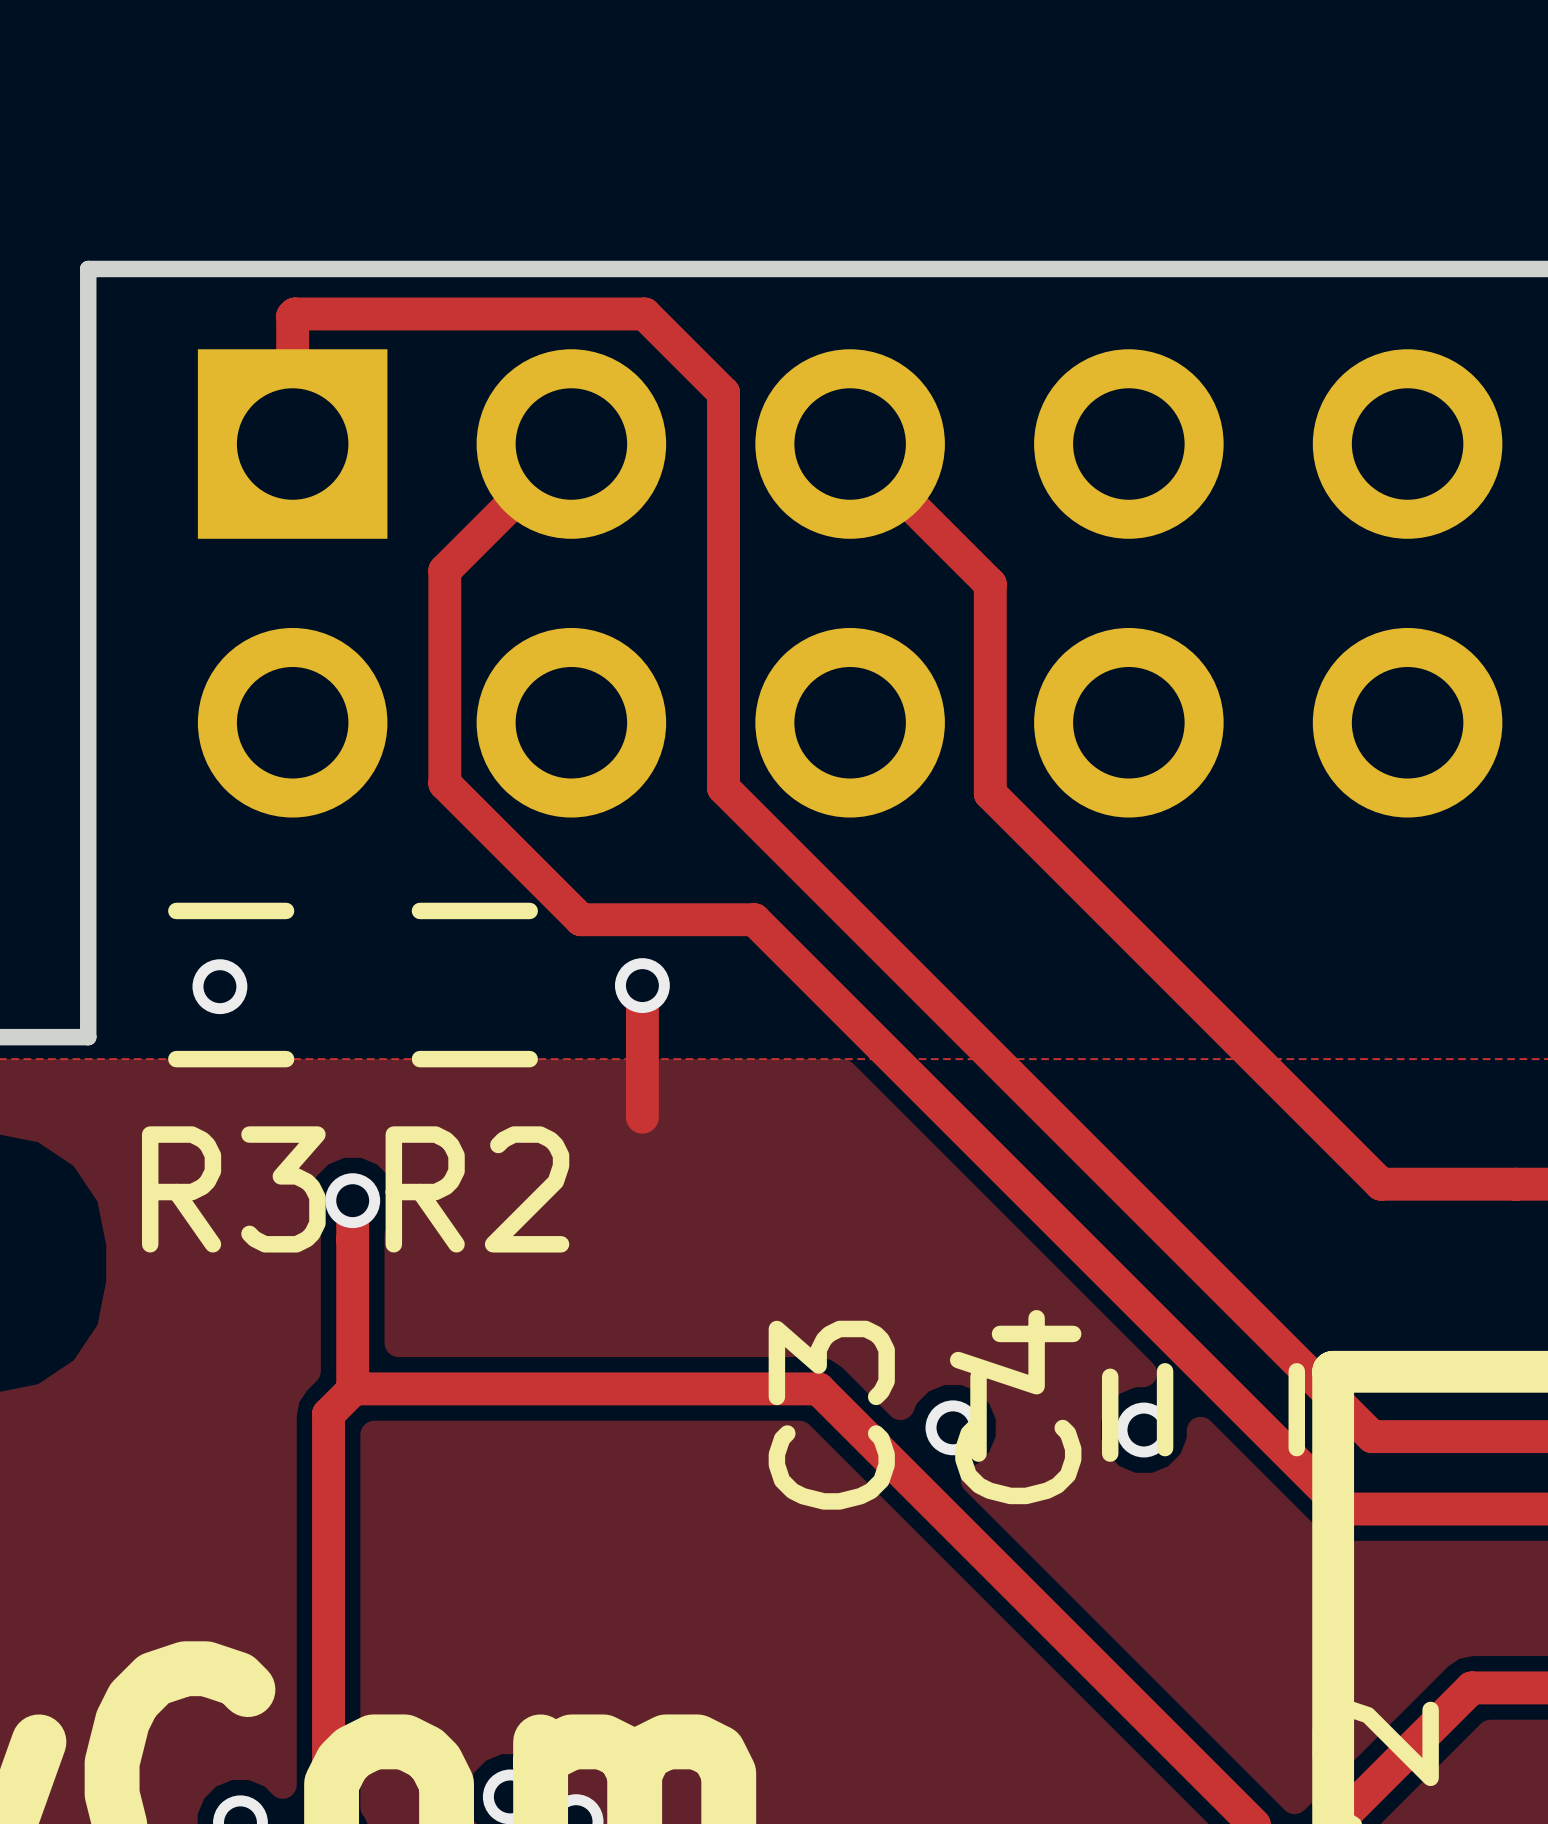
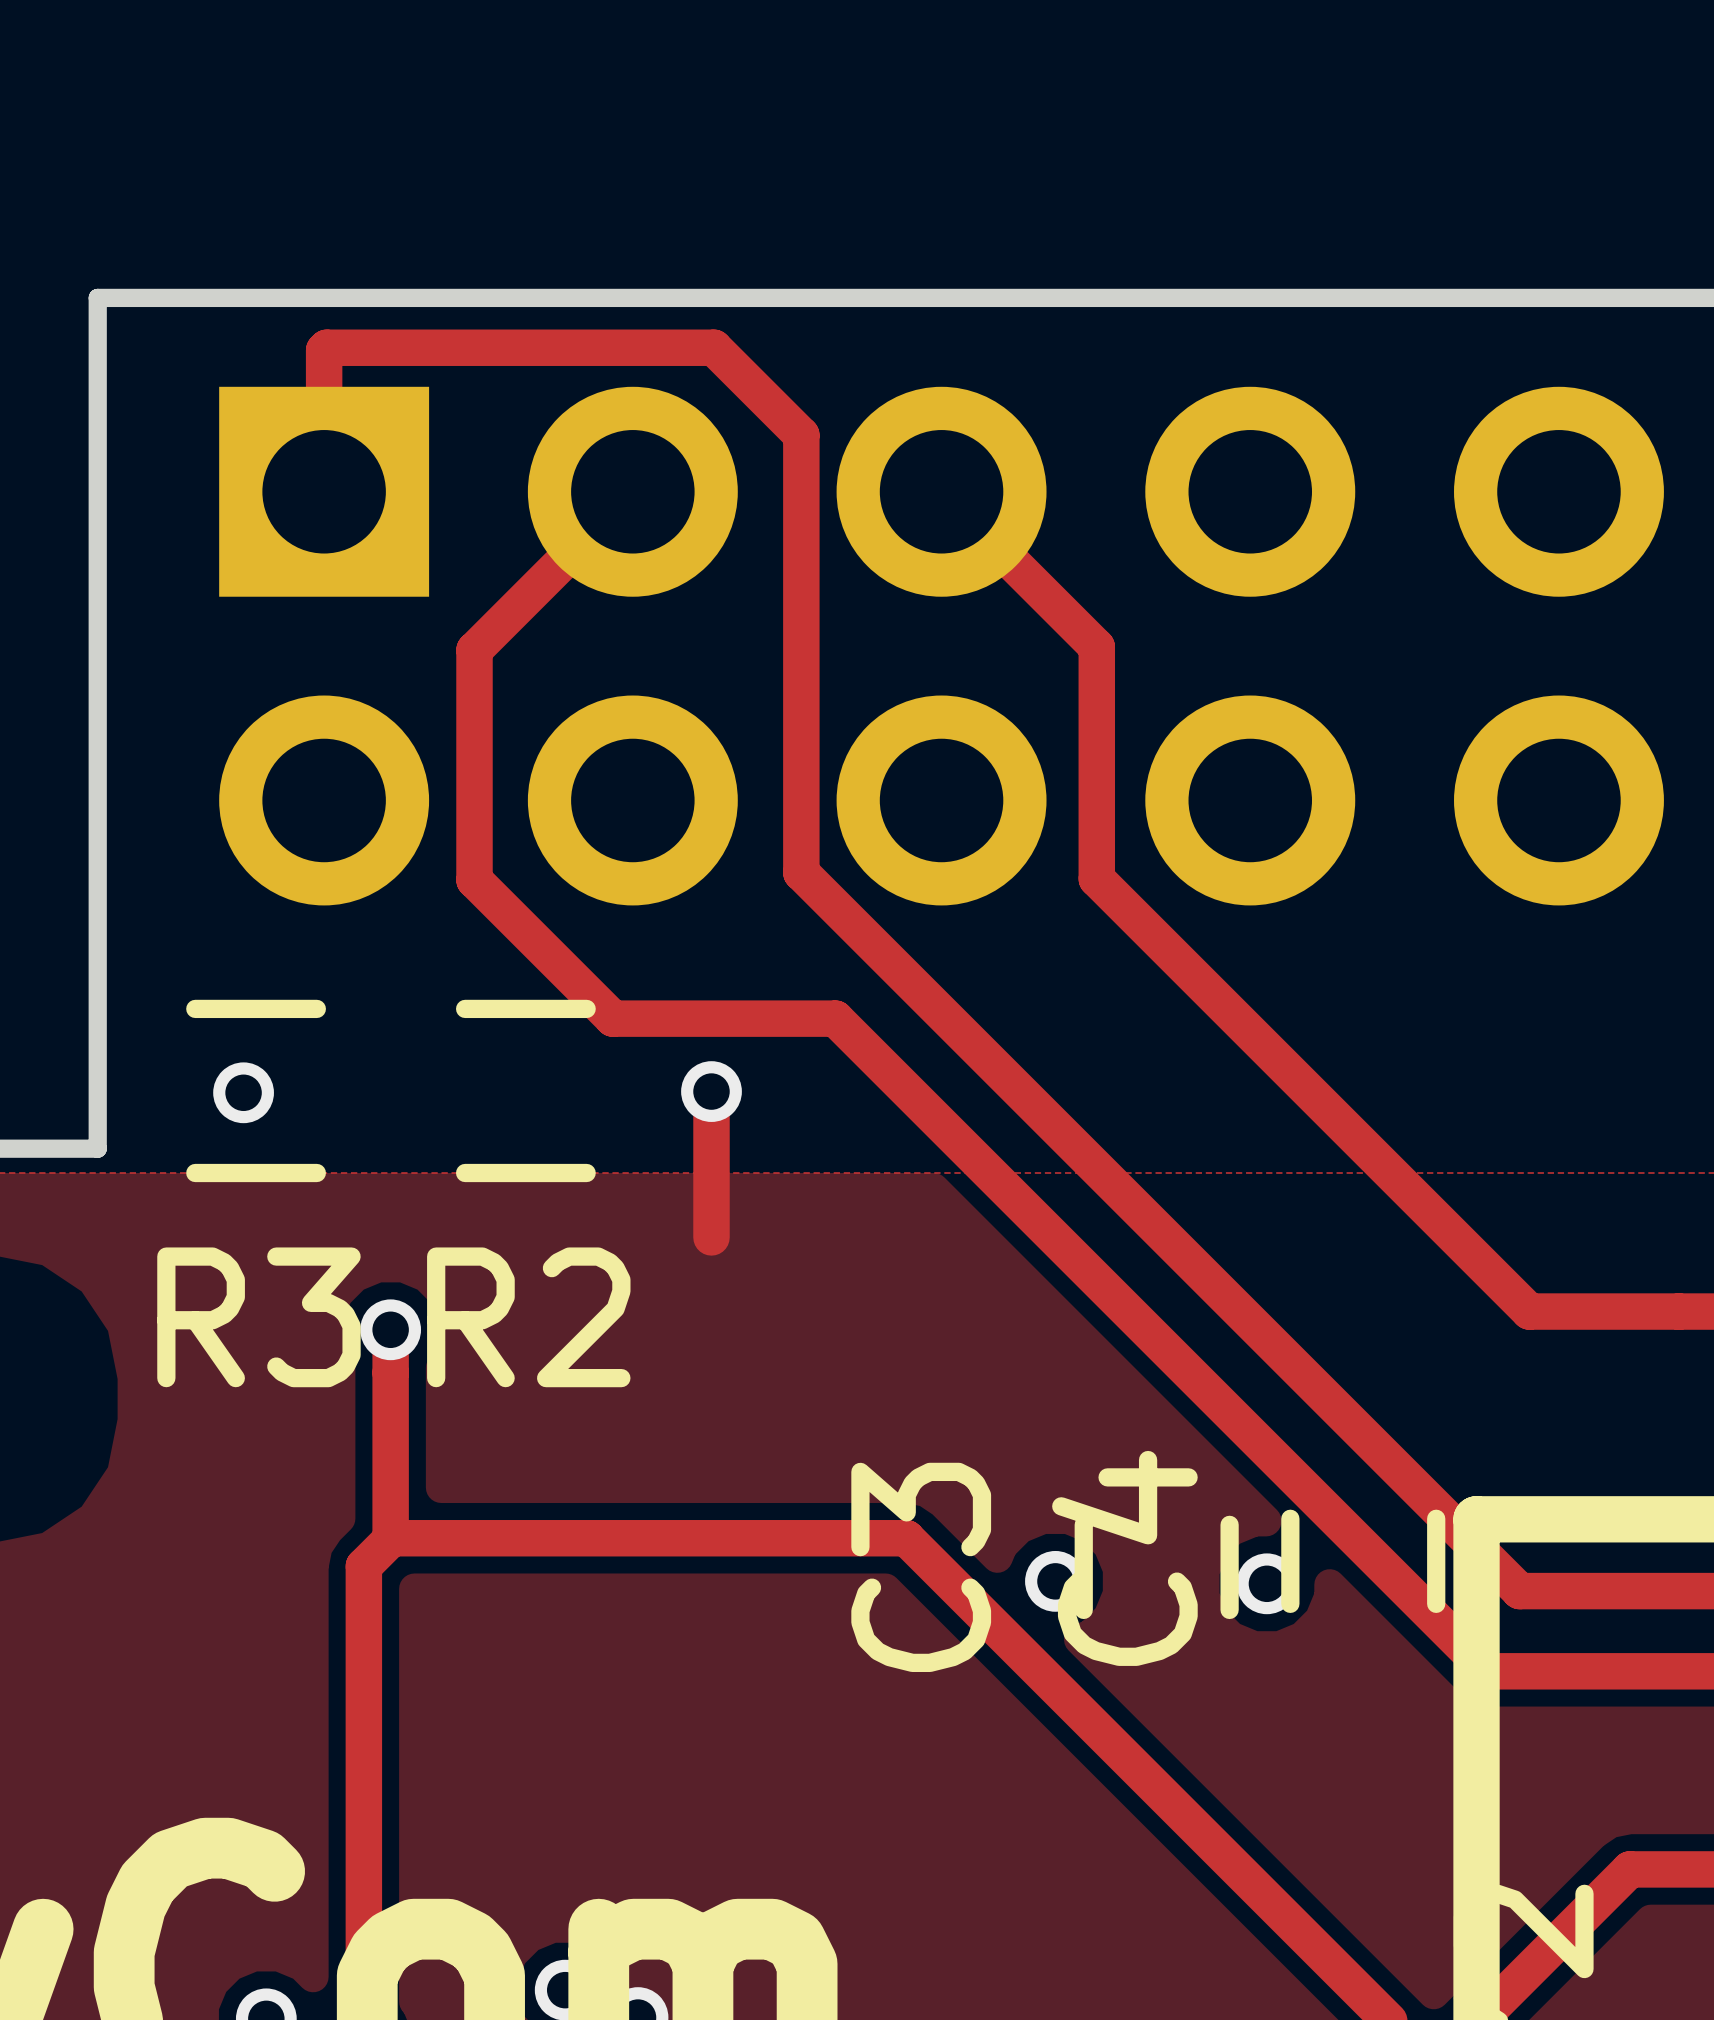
track: (444, 570) (444, 783) (581, 919) -> (492, 631) (474, 650) (474, 880) (613, 1018) (643, 1018)

